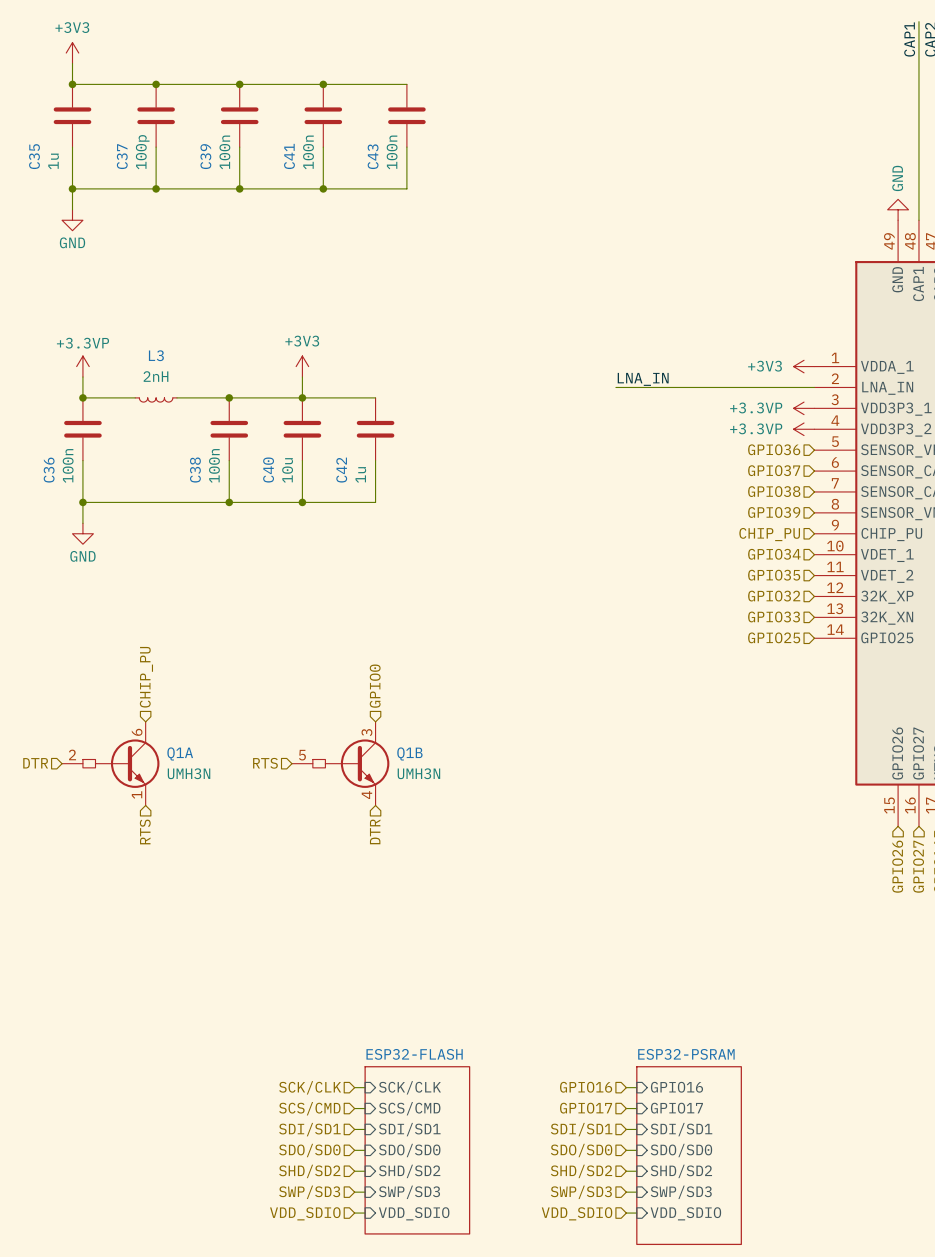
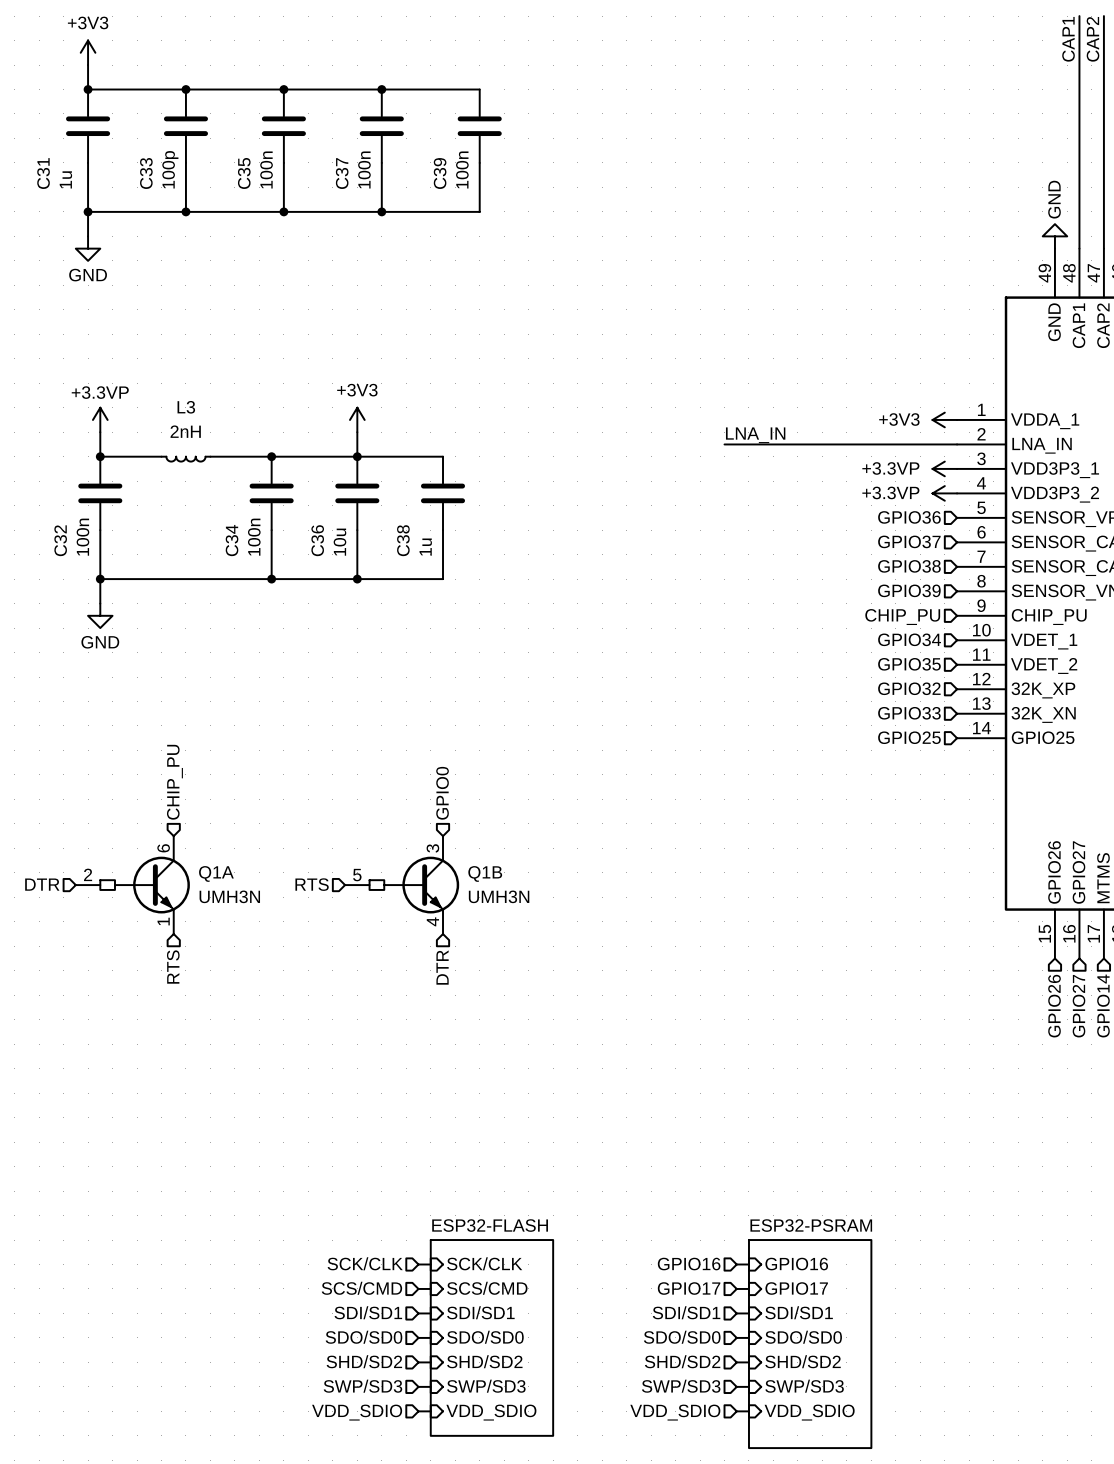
C35 name: C35 (34, 156) -> C31 (43, 173)
C37 name: C37 (122, 156) -> C33 (146, 173)
C39 name: C39 (205, 156) -> C35 (244, 173)
C41 name: C41 (289, 156) -> C37 (342, 173)
C43 name: C43 (373, 156) -> C39 (440, 173)
C36 name: C36 (49, 470) -> C32 (60, 540)
C38 name: C38 (195, 470) -> C34 (232, 540)
C40 name: C40 (268, 470) -> C36 (317, 540)
C42 name: C42 (341, 470) -> C38 (403, 540)

